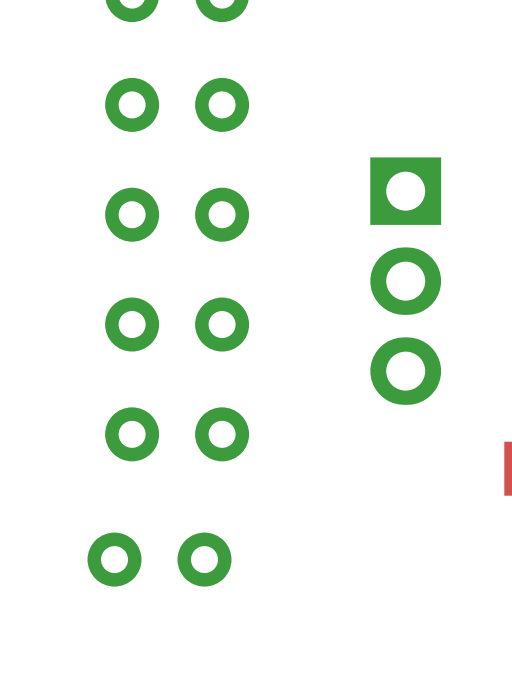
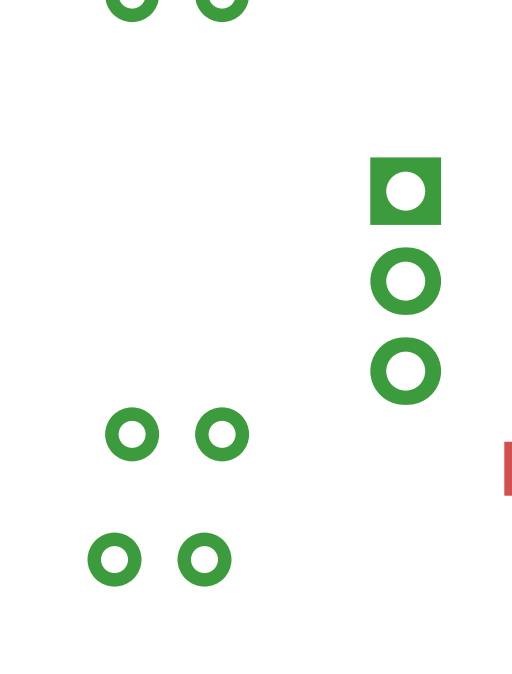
part: (177, 104) -> none
part: (177, 214) -> none
part: (177, 324) -> none

